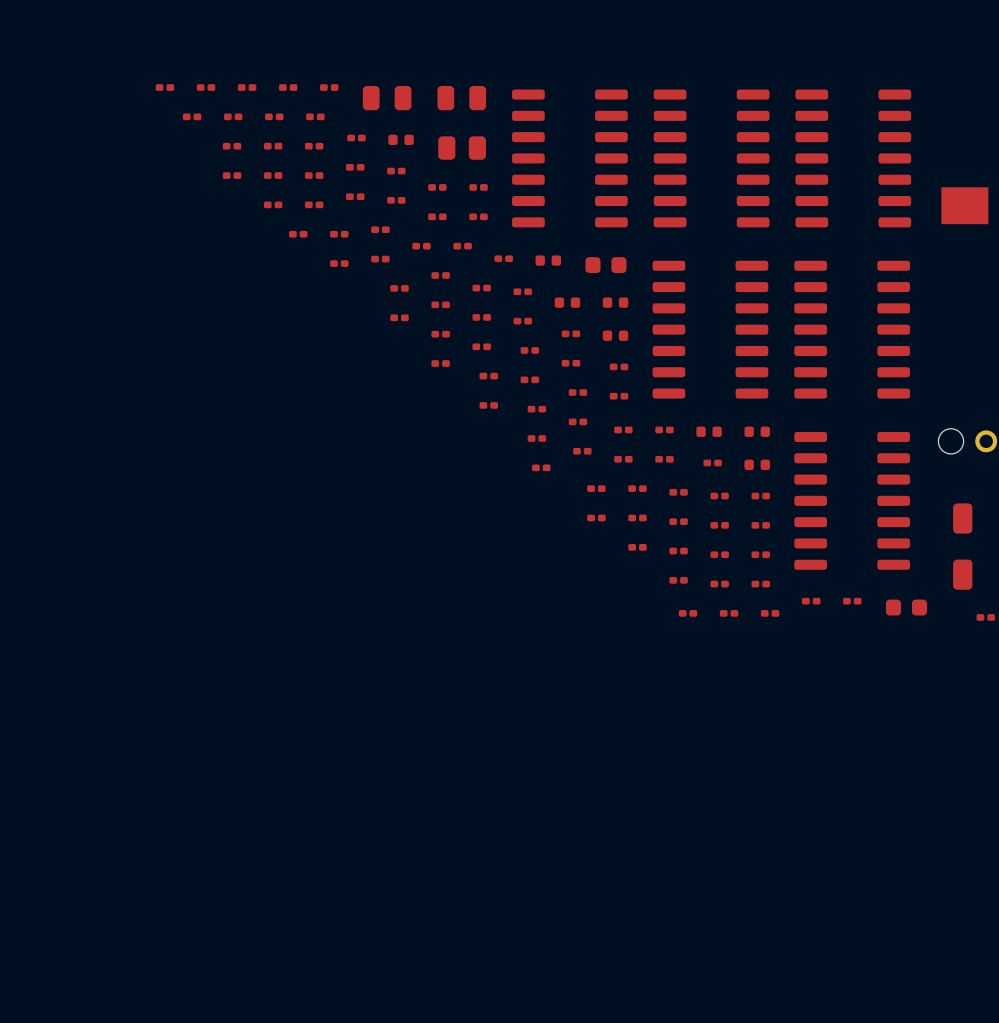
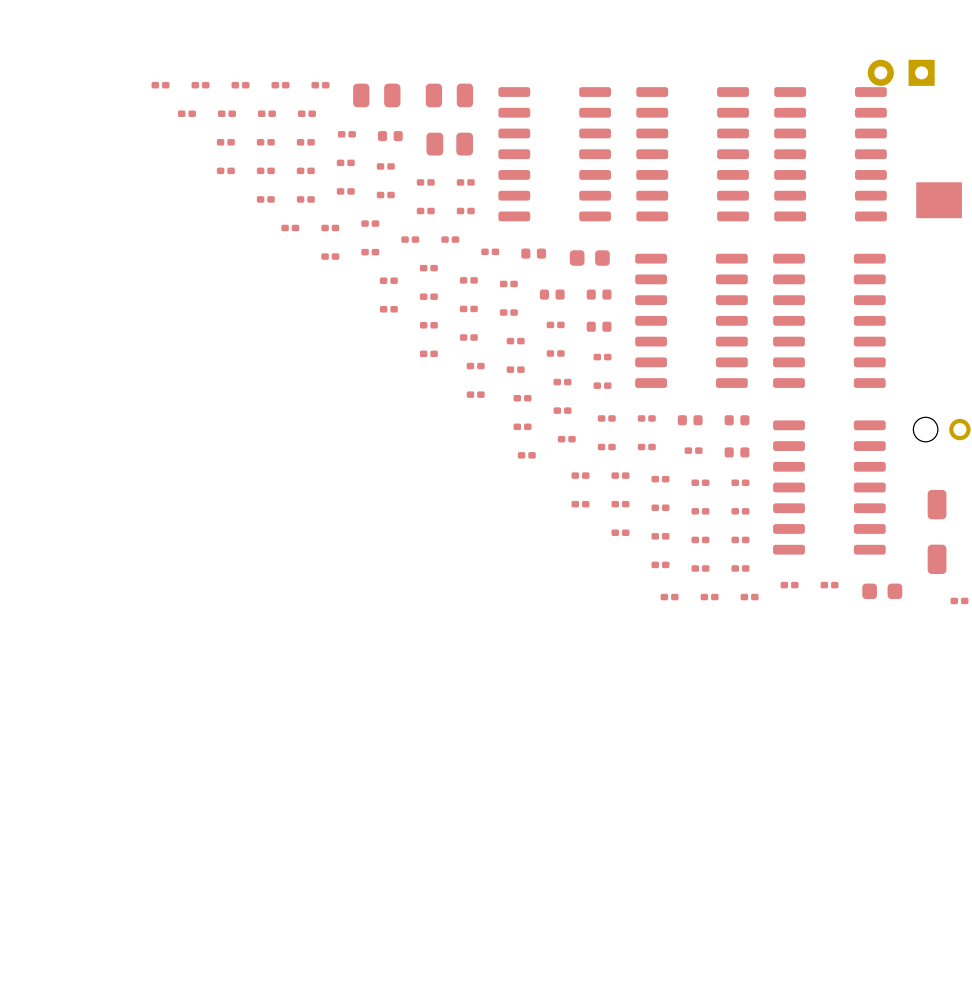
part: none -> (901, 72)

